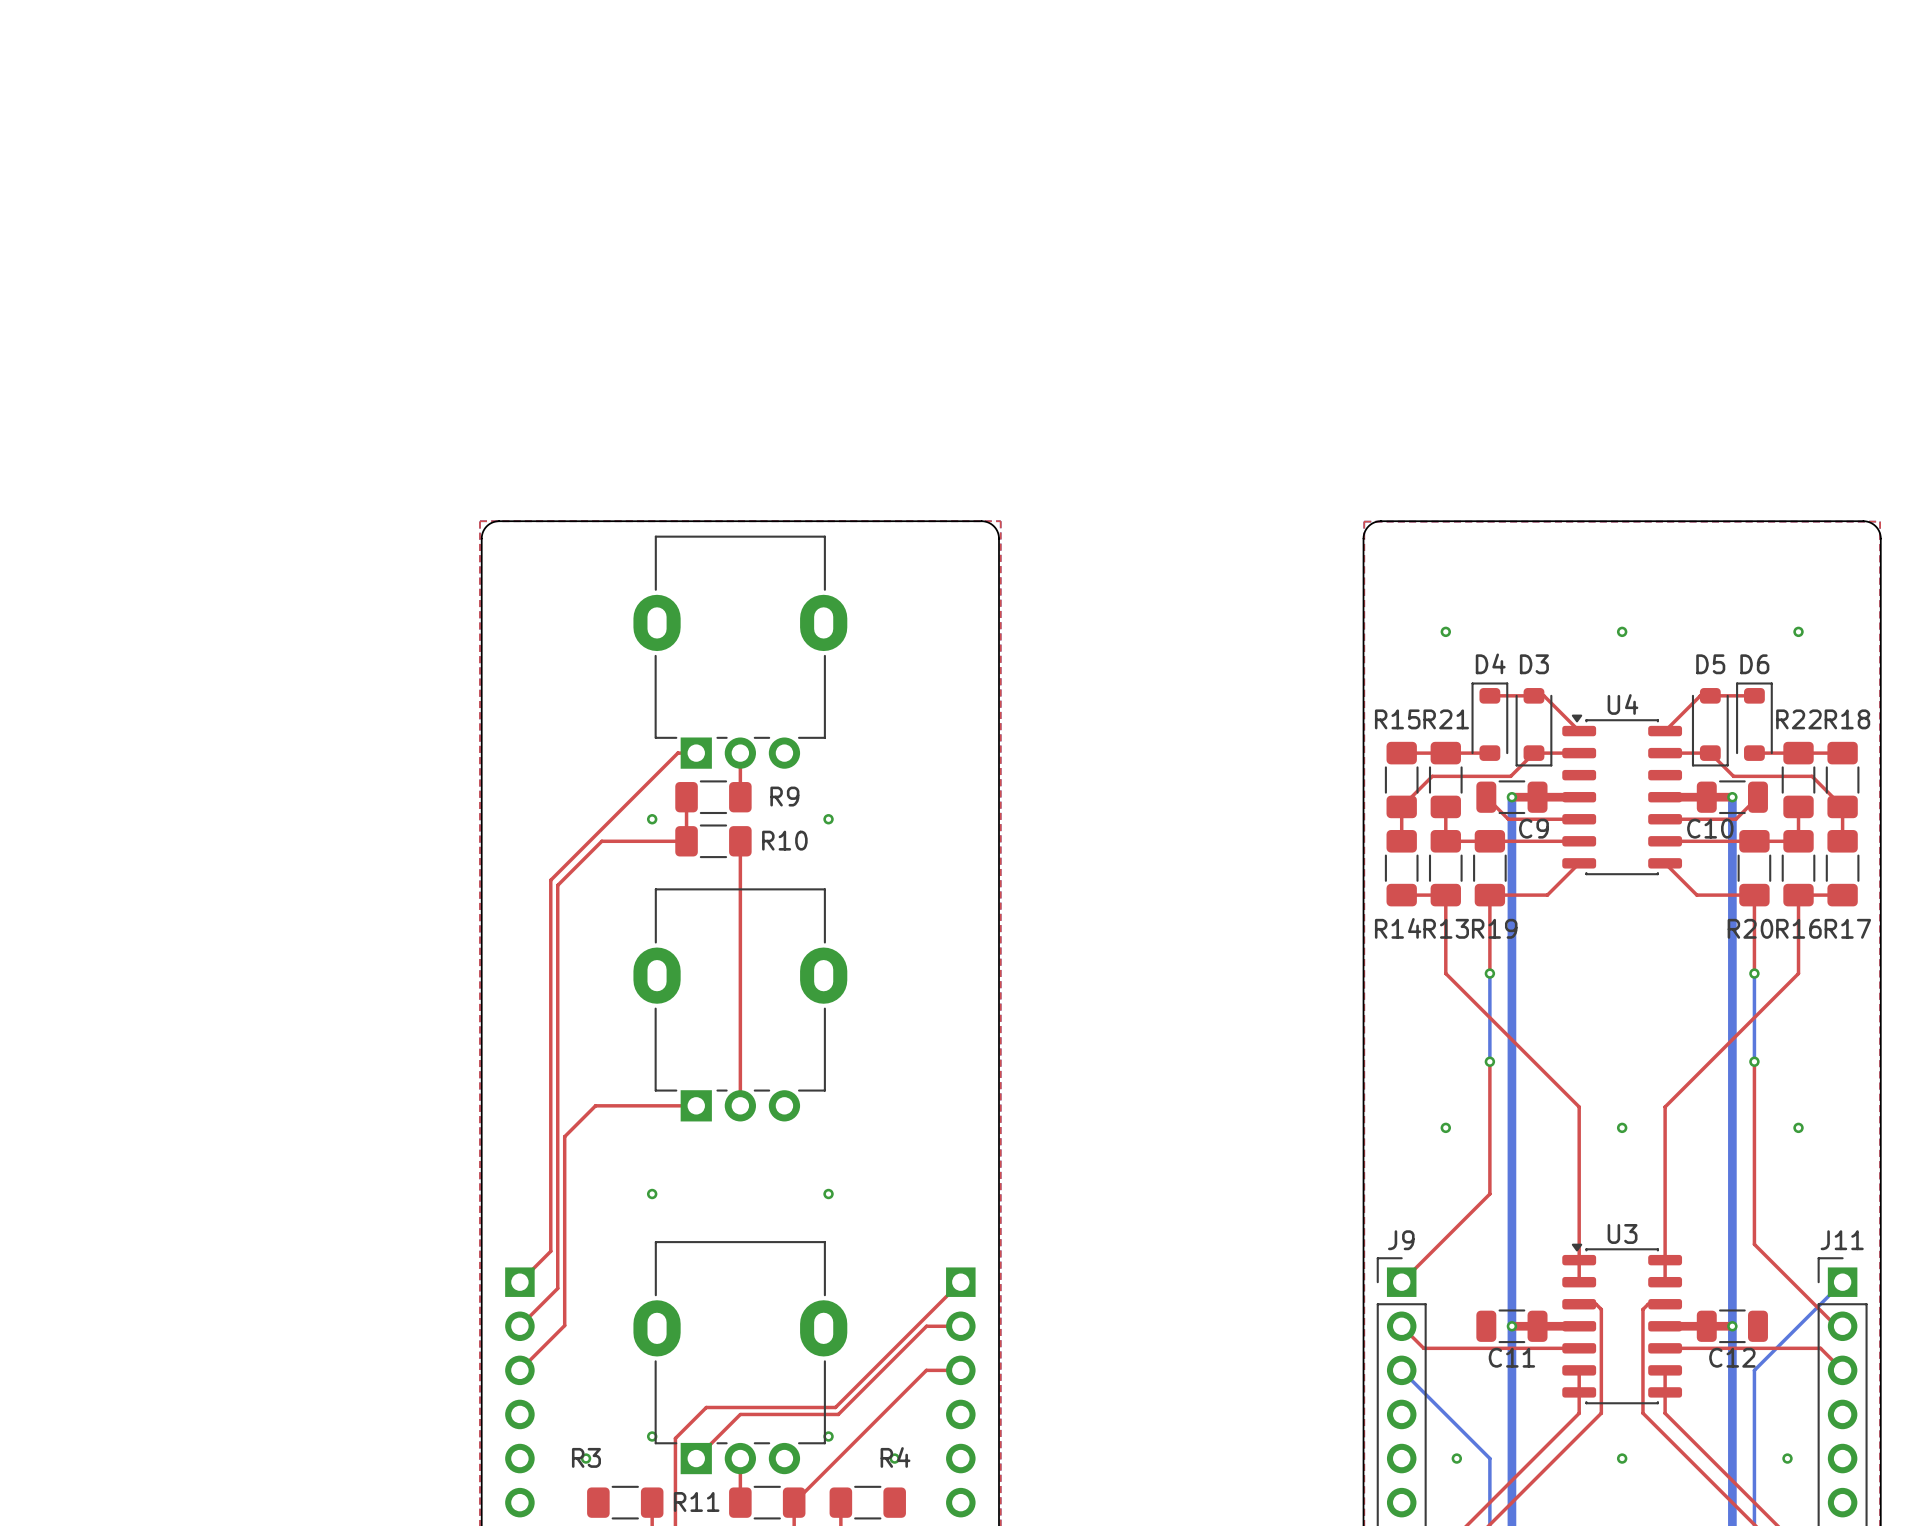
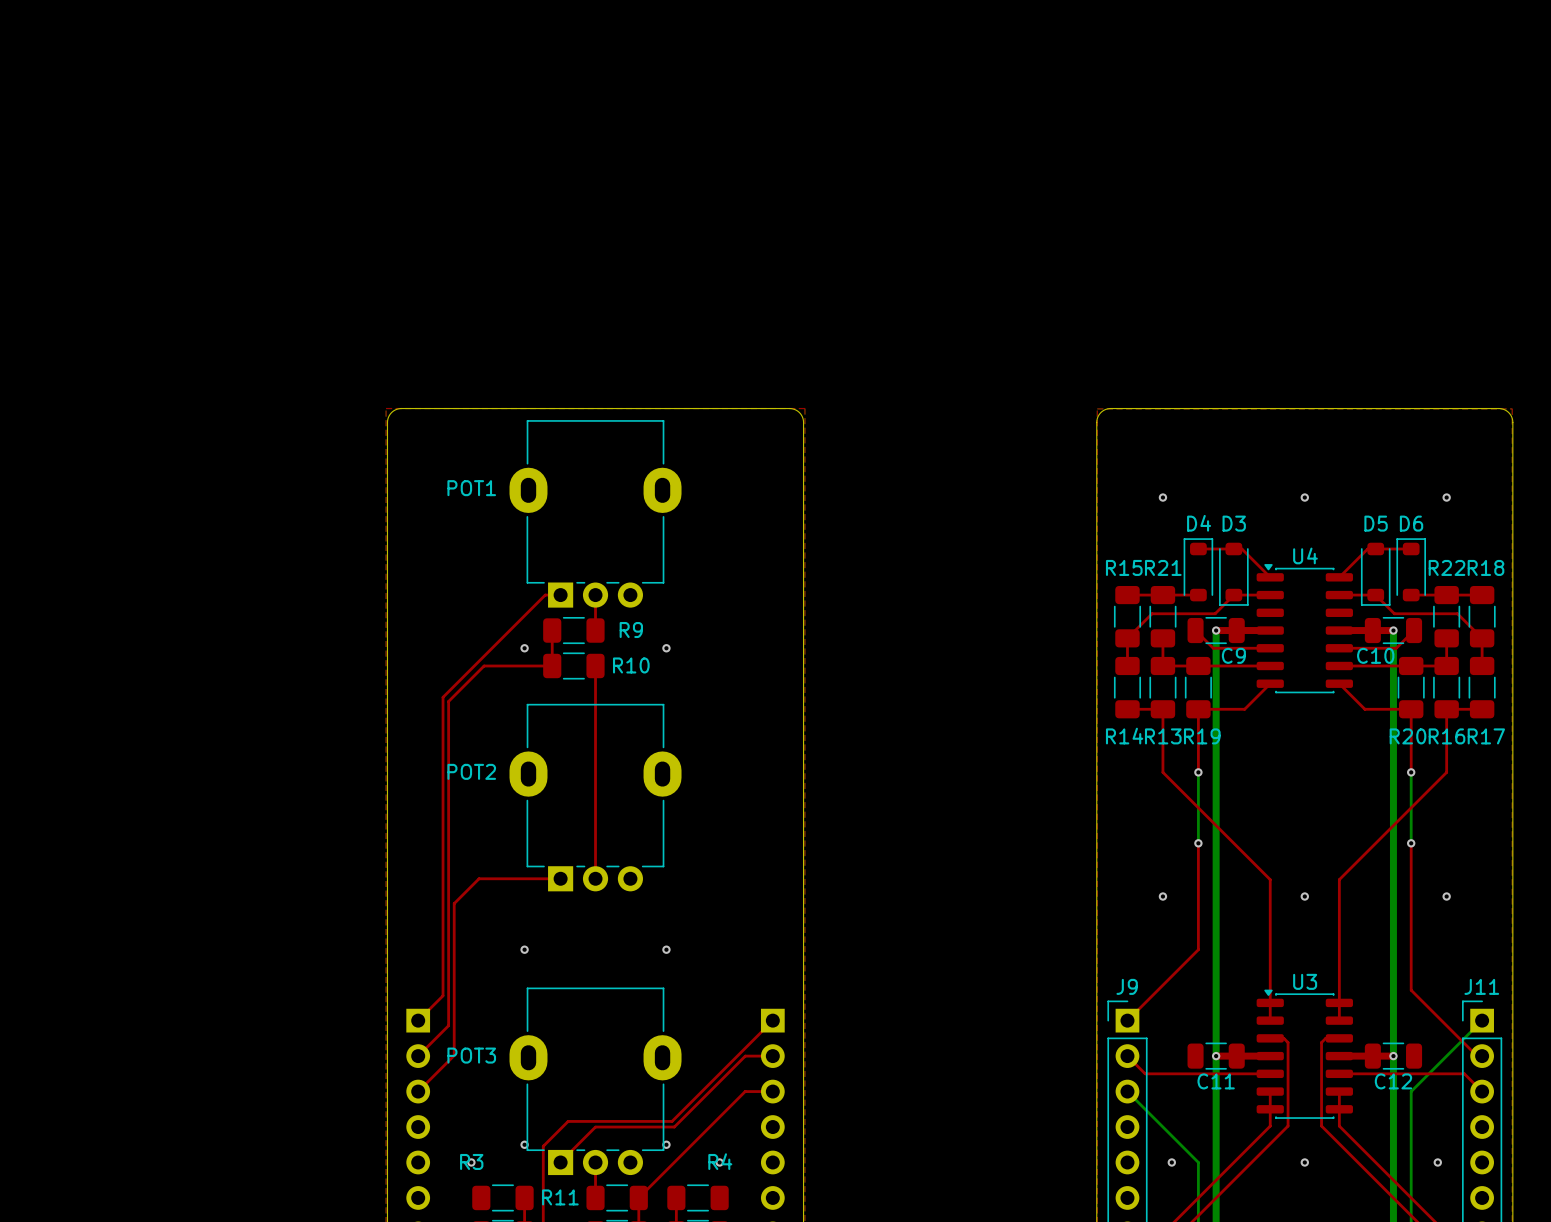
part: (740, 652) -> none
POT1: none -> (595, 513)
part: (740, 1004) -> none
POT2: none -> (595, 797)
part: (740, 1357) -> none
POT3: none -> (595, 1081)

